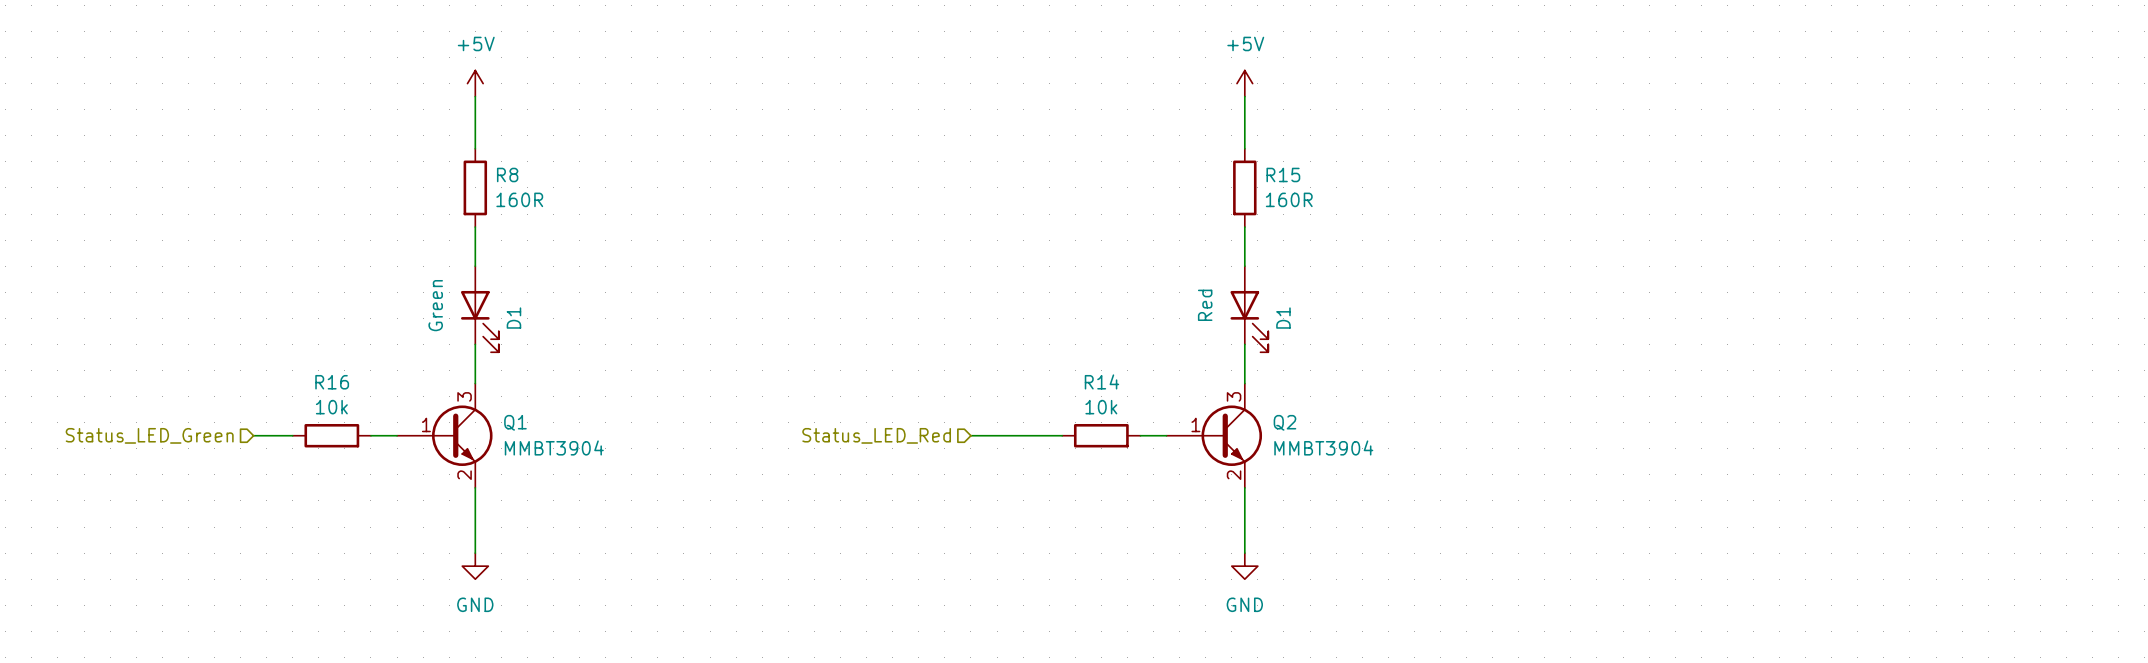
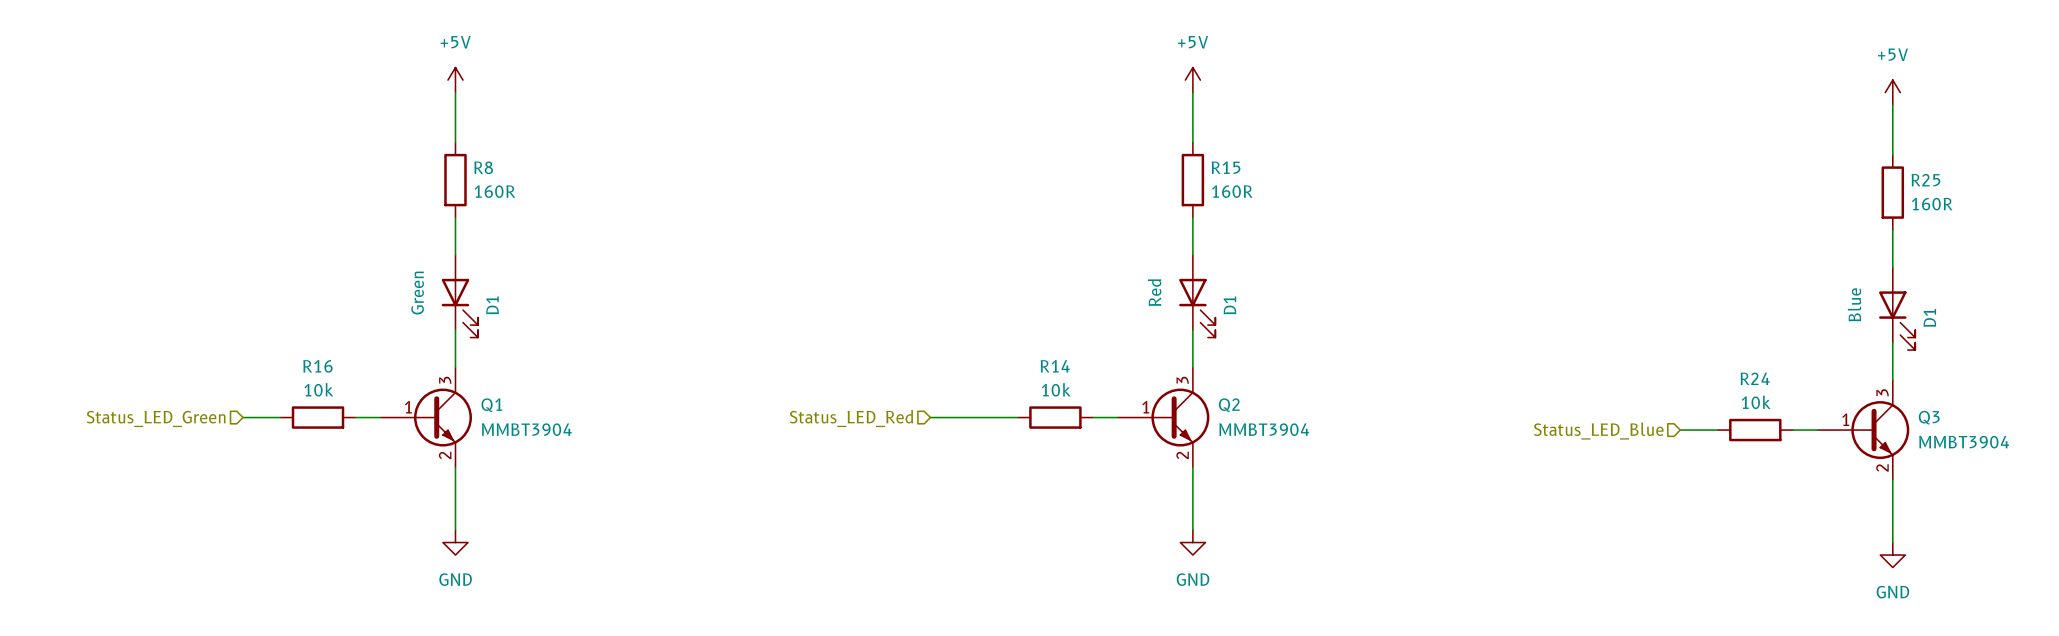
power symbol: none -> +5V (1892, 92)
wire: none -> (1892, 105) (1892, 155)
R25: none -> 160R (1892, 192)
wire: none -> (1892, 230) (1892, 267)
D1: none -> Blue (1897, 308)
wire: none -> (1892, 342) (1892, 380)
hierarchical label: none -> Status_LED_Blue (1598, 431)
wire: none -> (1680, 430) (1717, 430)
R24: none -> 10k (1755, 430)
wire: none -> (1792, 430) (1817, 430)
Q3: none -> MMBT3904 (1863, 430)
wire: none -> (1892, 480) (1892, 542)
power symbol: none -> GND (1892, 555)

